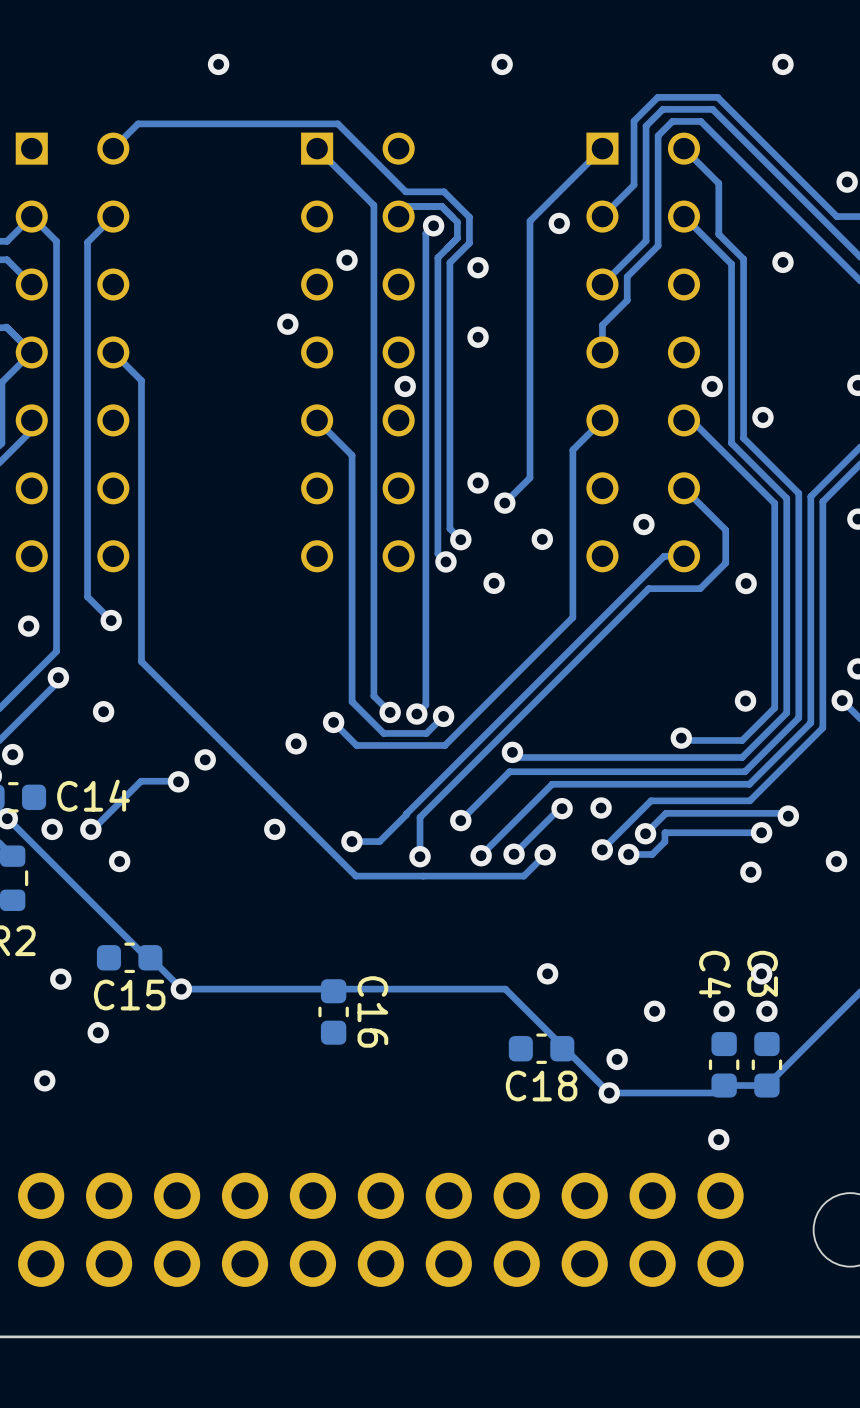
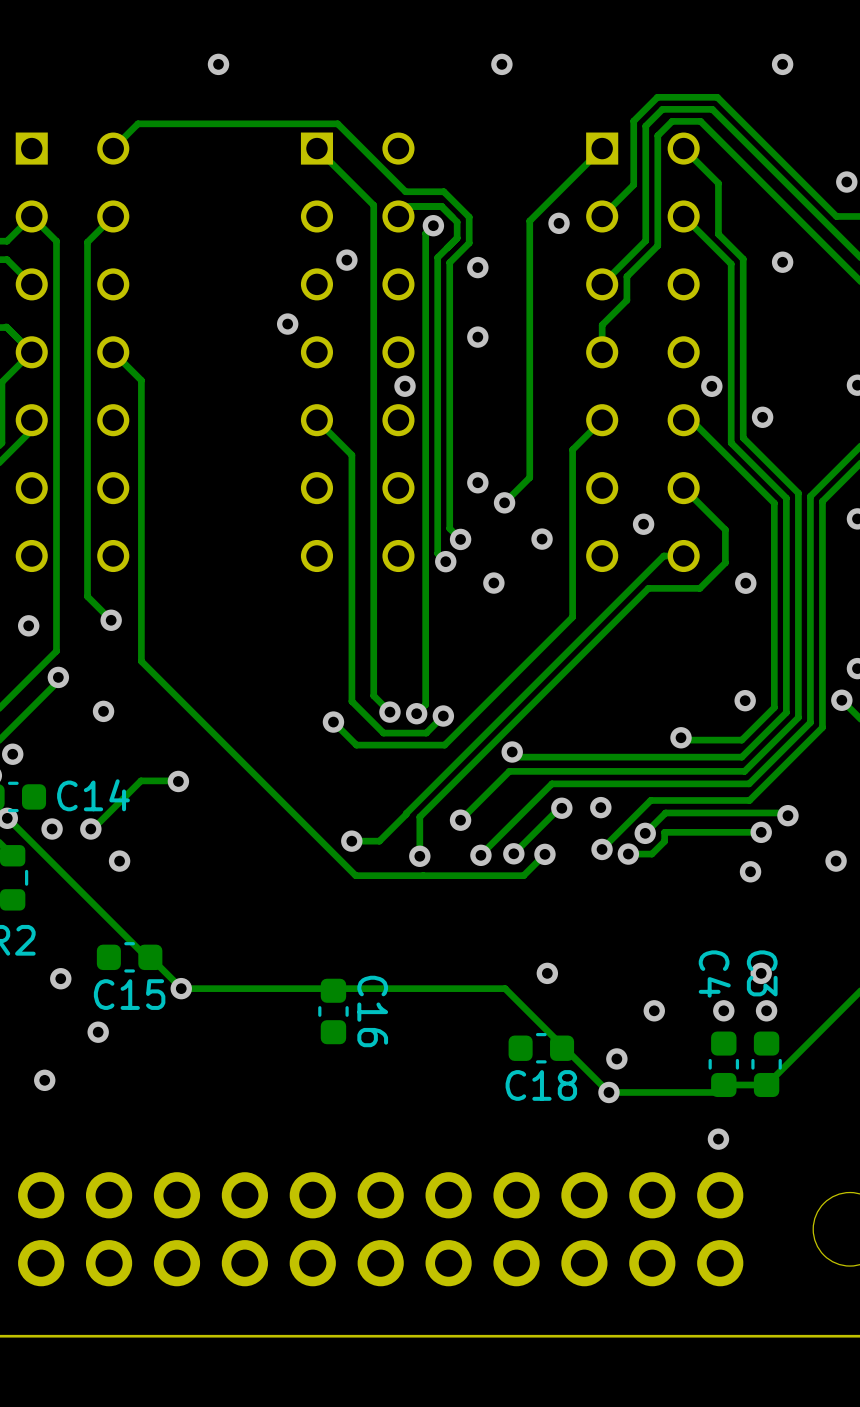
via: (296, 743) -> none
via: (205, 759) -> none
via: (274, 829) -> none

